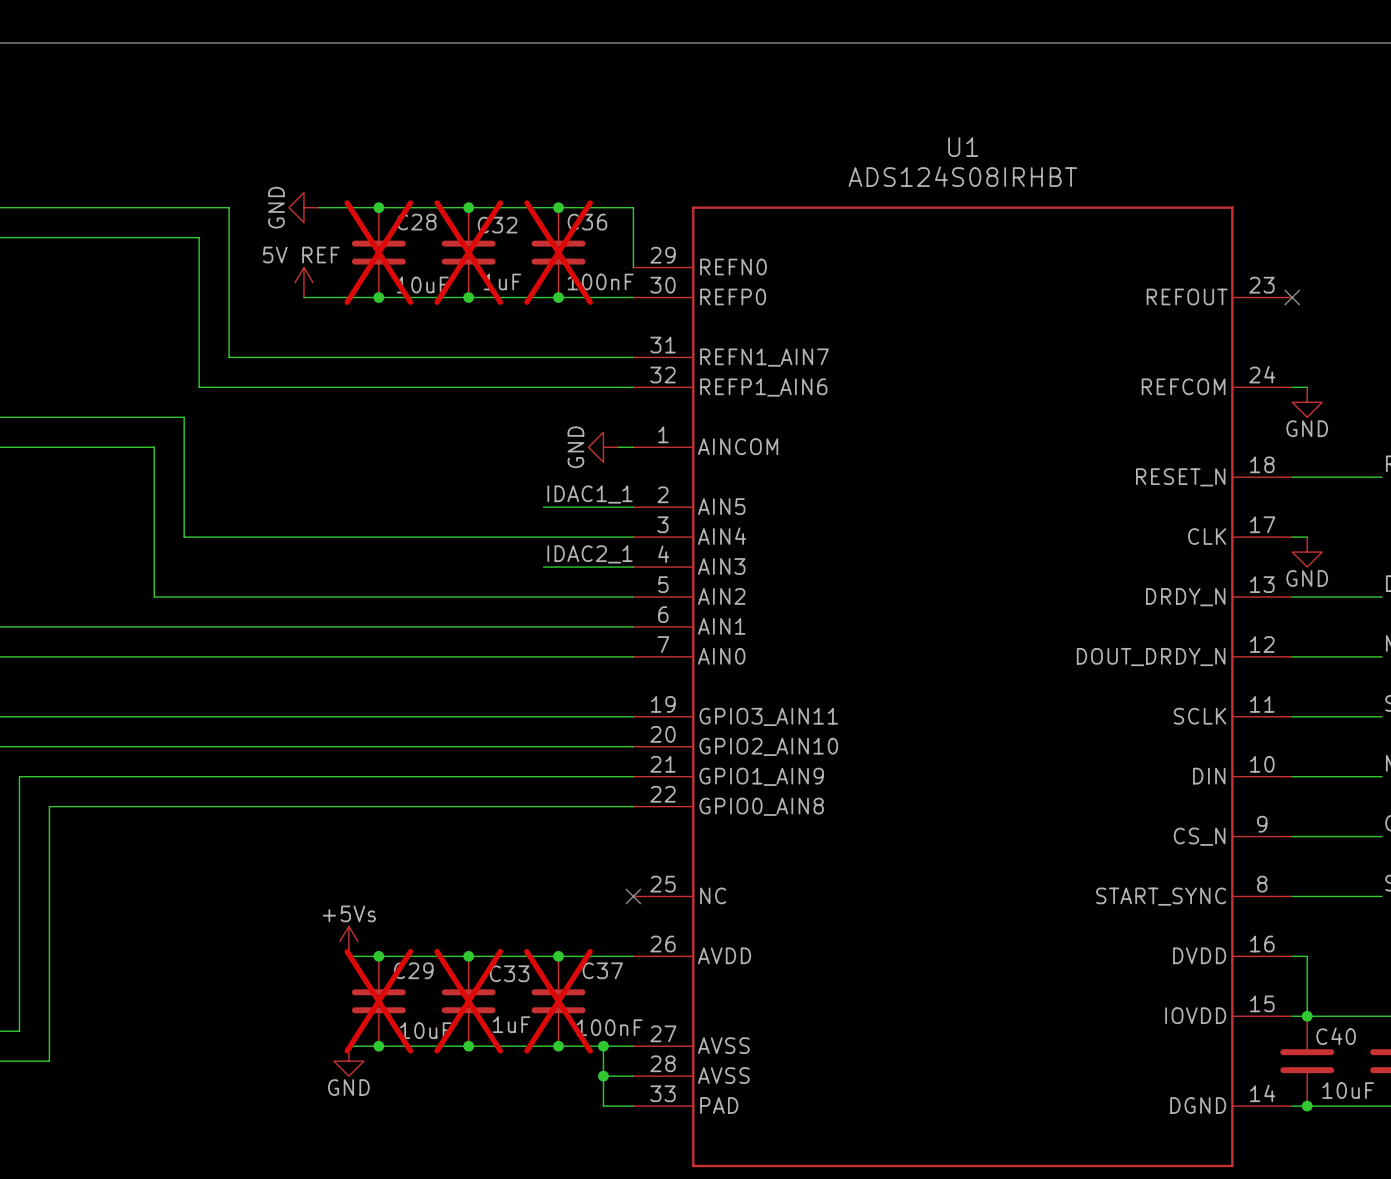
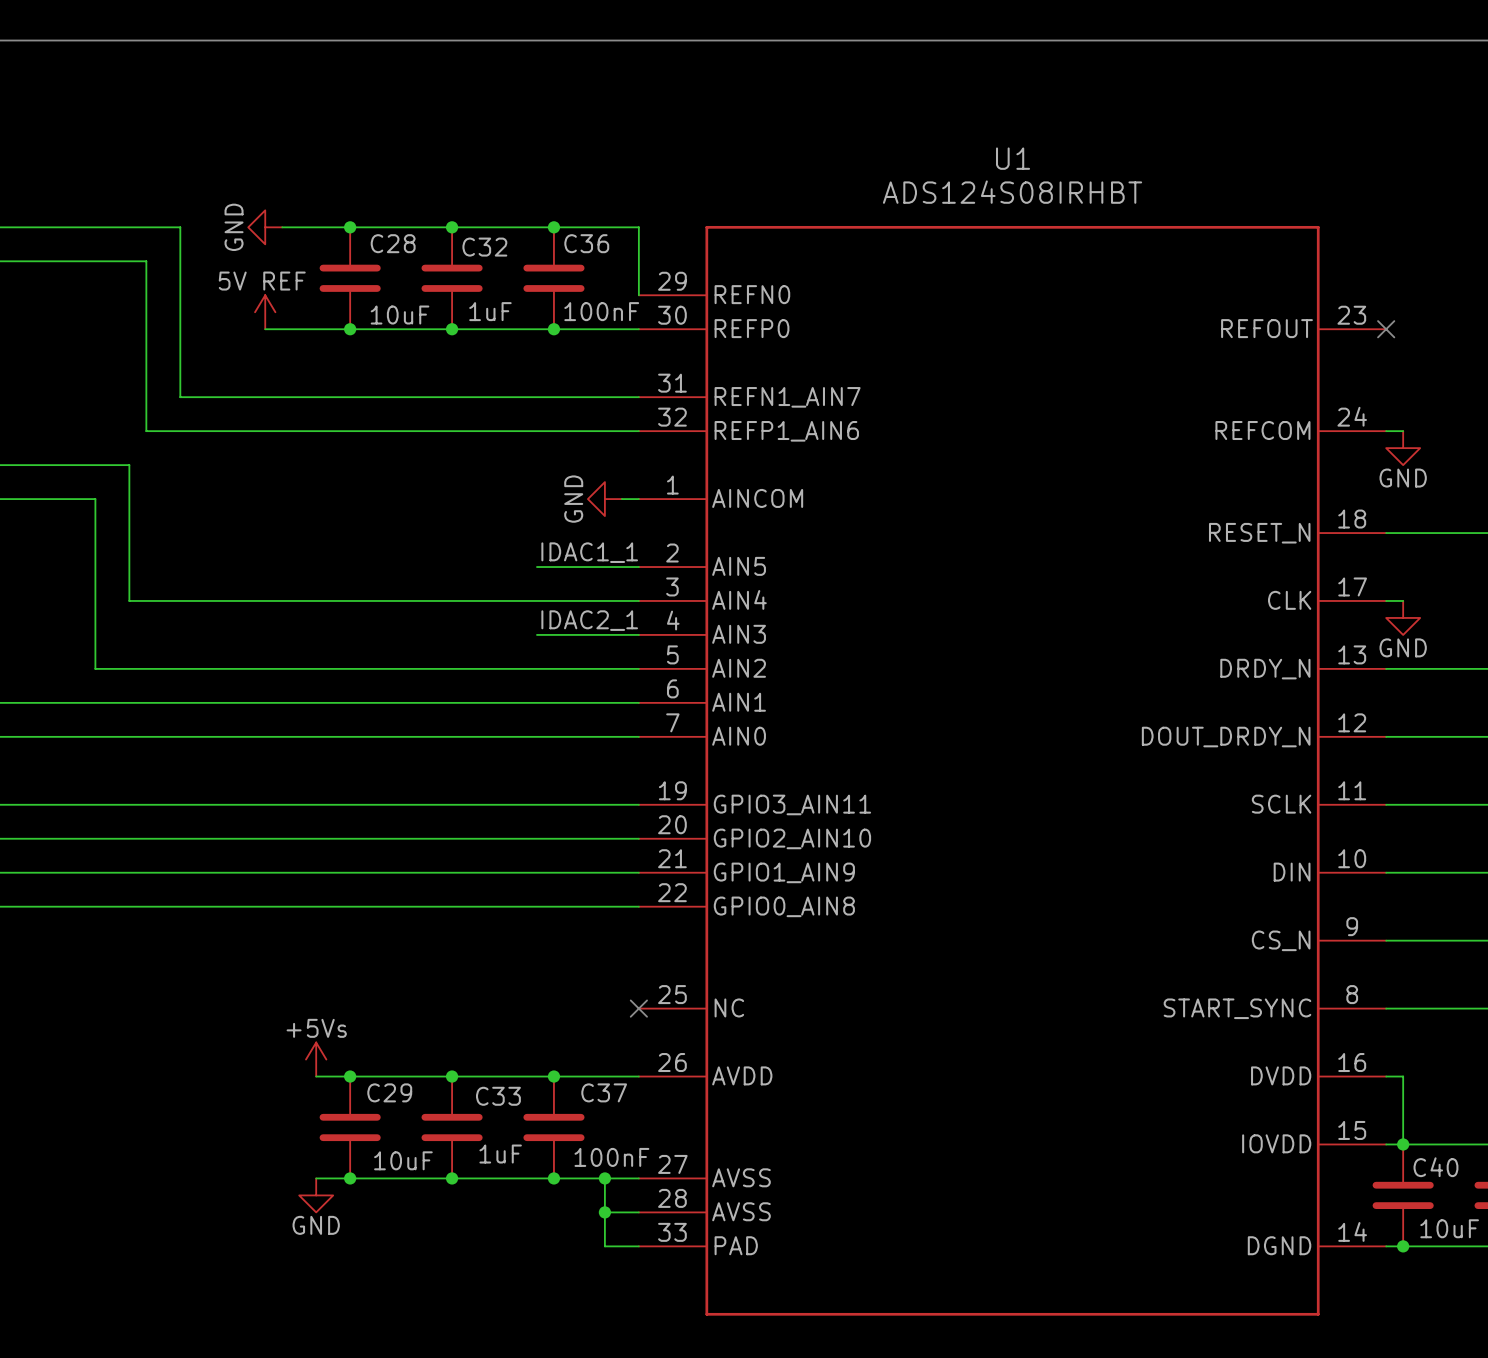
C28 do-not-place cross: (378, 252) -> none
C32 do-not-place cross: (468, 252) -> none
C36 do-not-place cross: (558, 252) -> none
C29 do-not-place cross: (378, 1001) -> none
C33 do-not-place cross: (468, 1001) -> none
C37 do-not-place cross: (558, 1001) -> none

